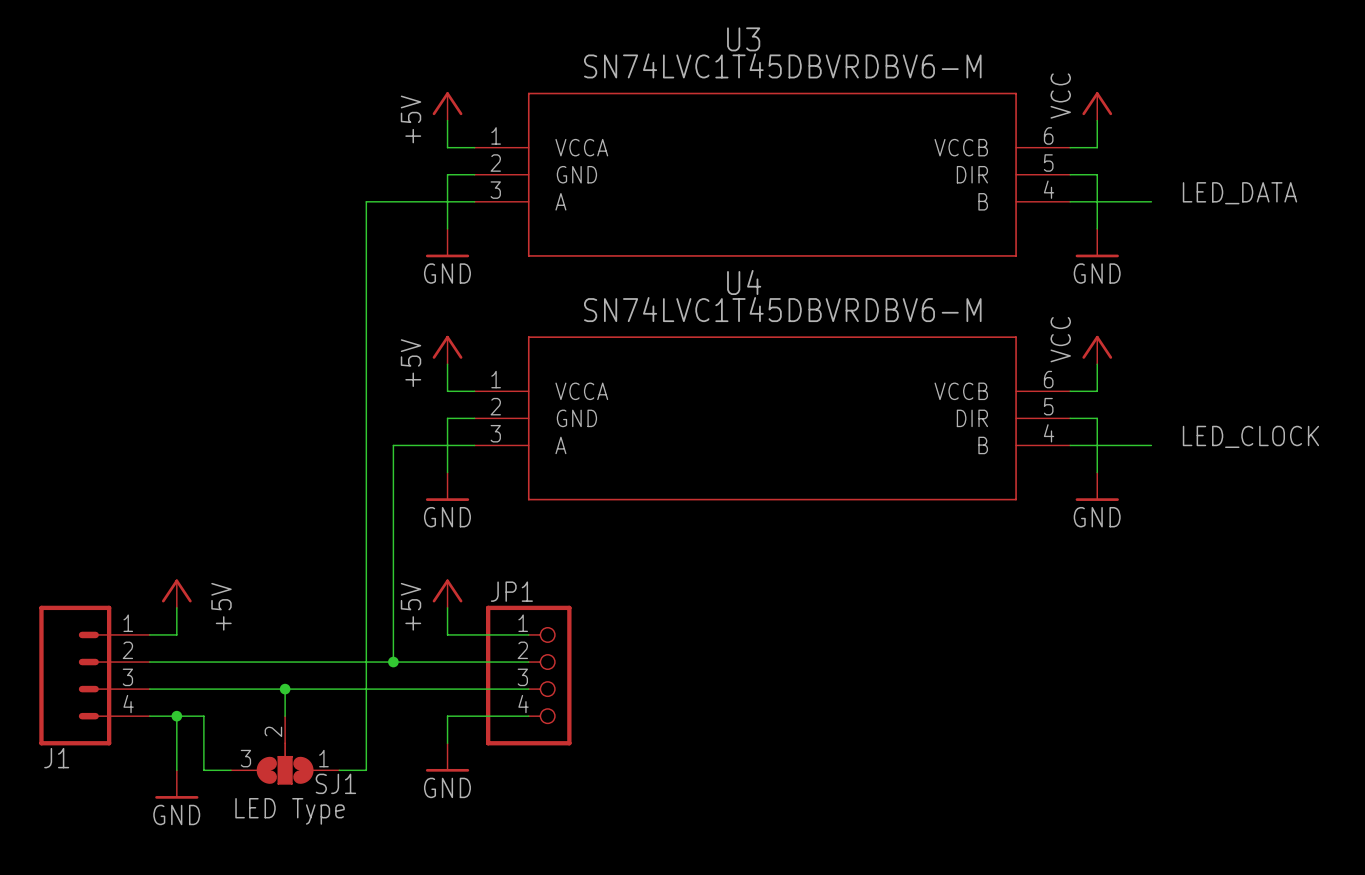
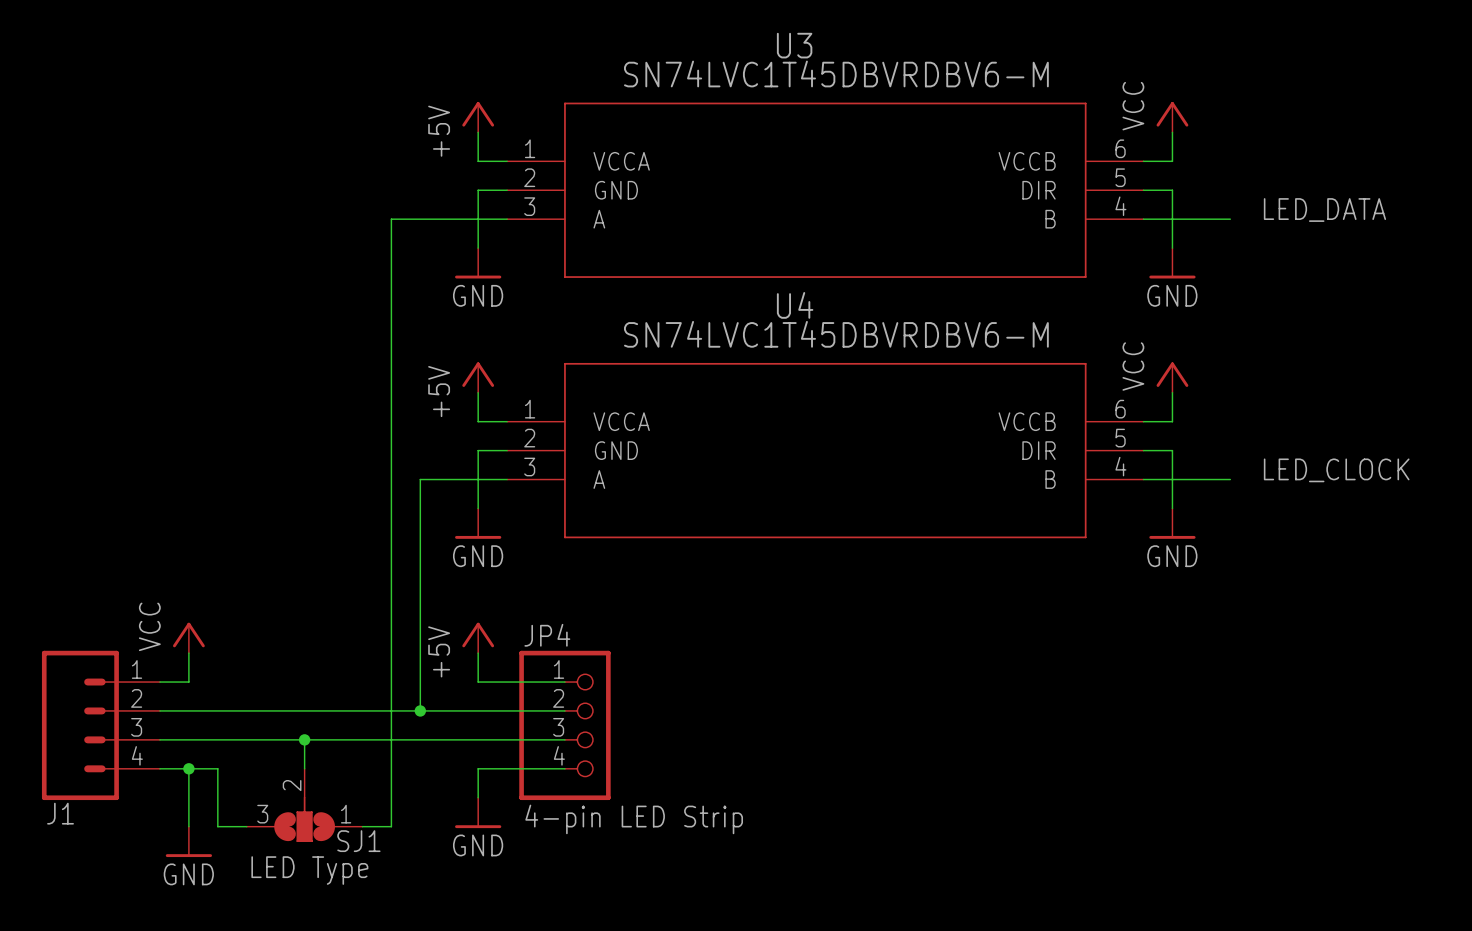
JP1 name: JP1 (511, 591) -> JP4 (547, 635)
power symbol: +5V (176, 593) -> VCC (188, 637)
JP1 value: none -> 4-pin LED Strip (634, 819)

